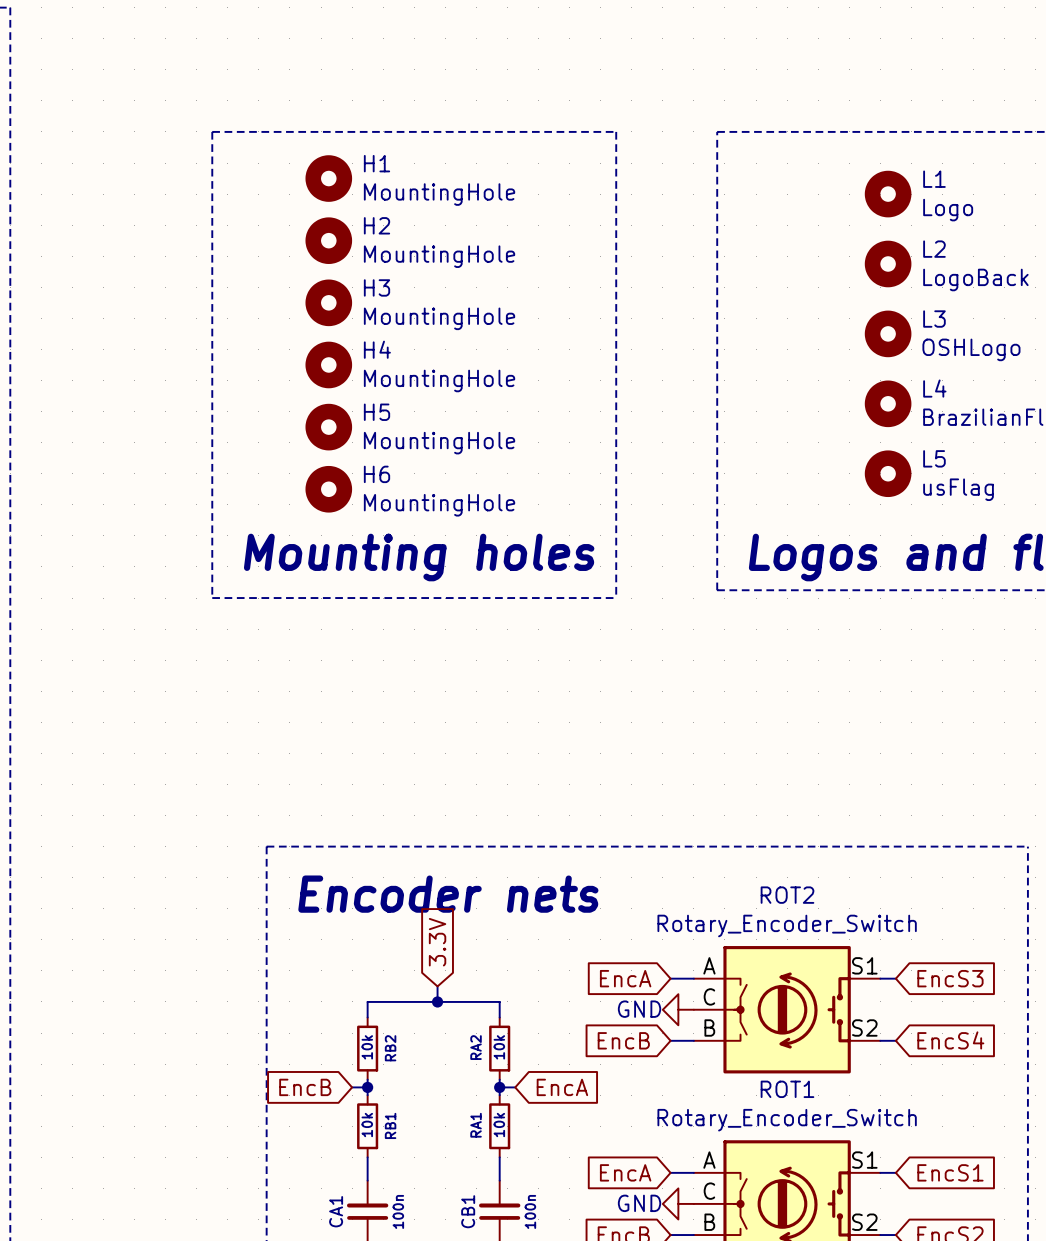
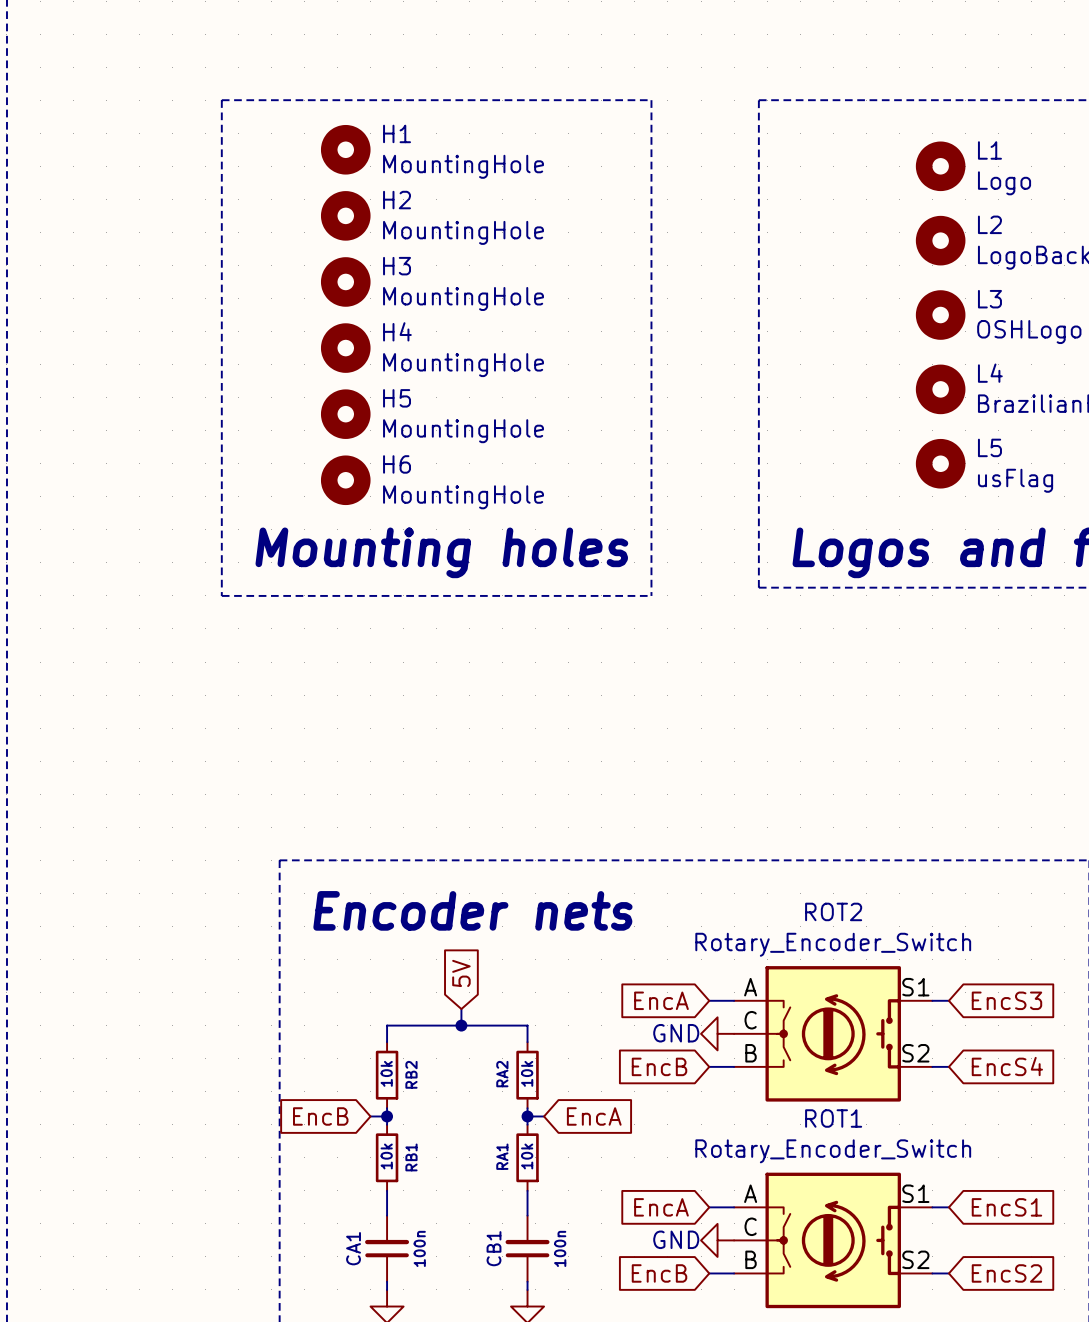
global label: 3.3V (437, 942) -> 5V (461, 973)

